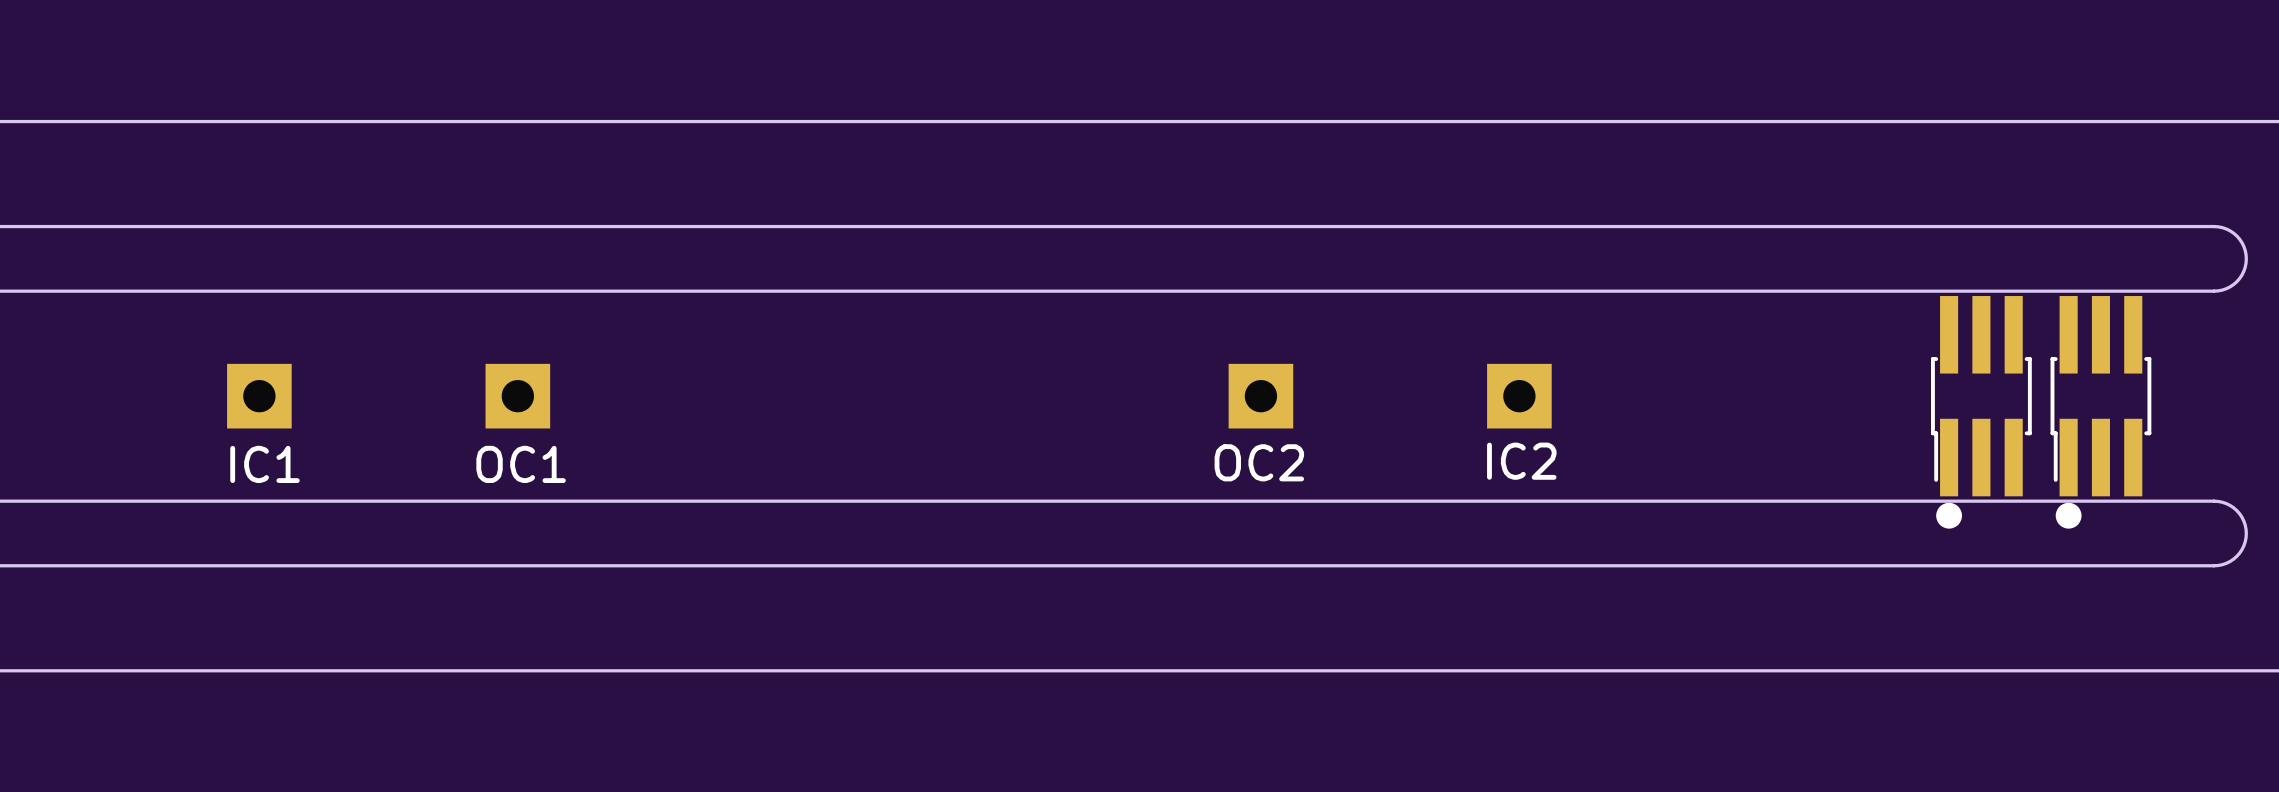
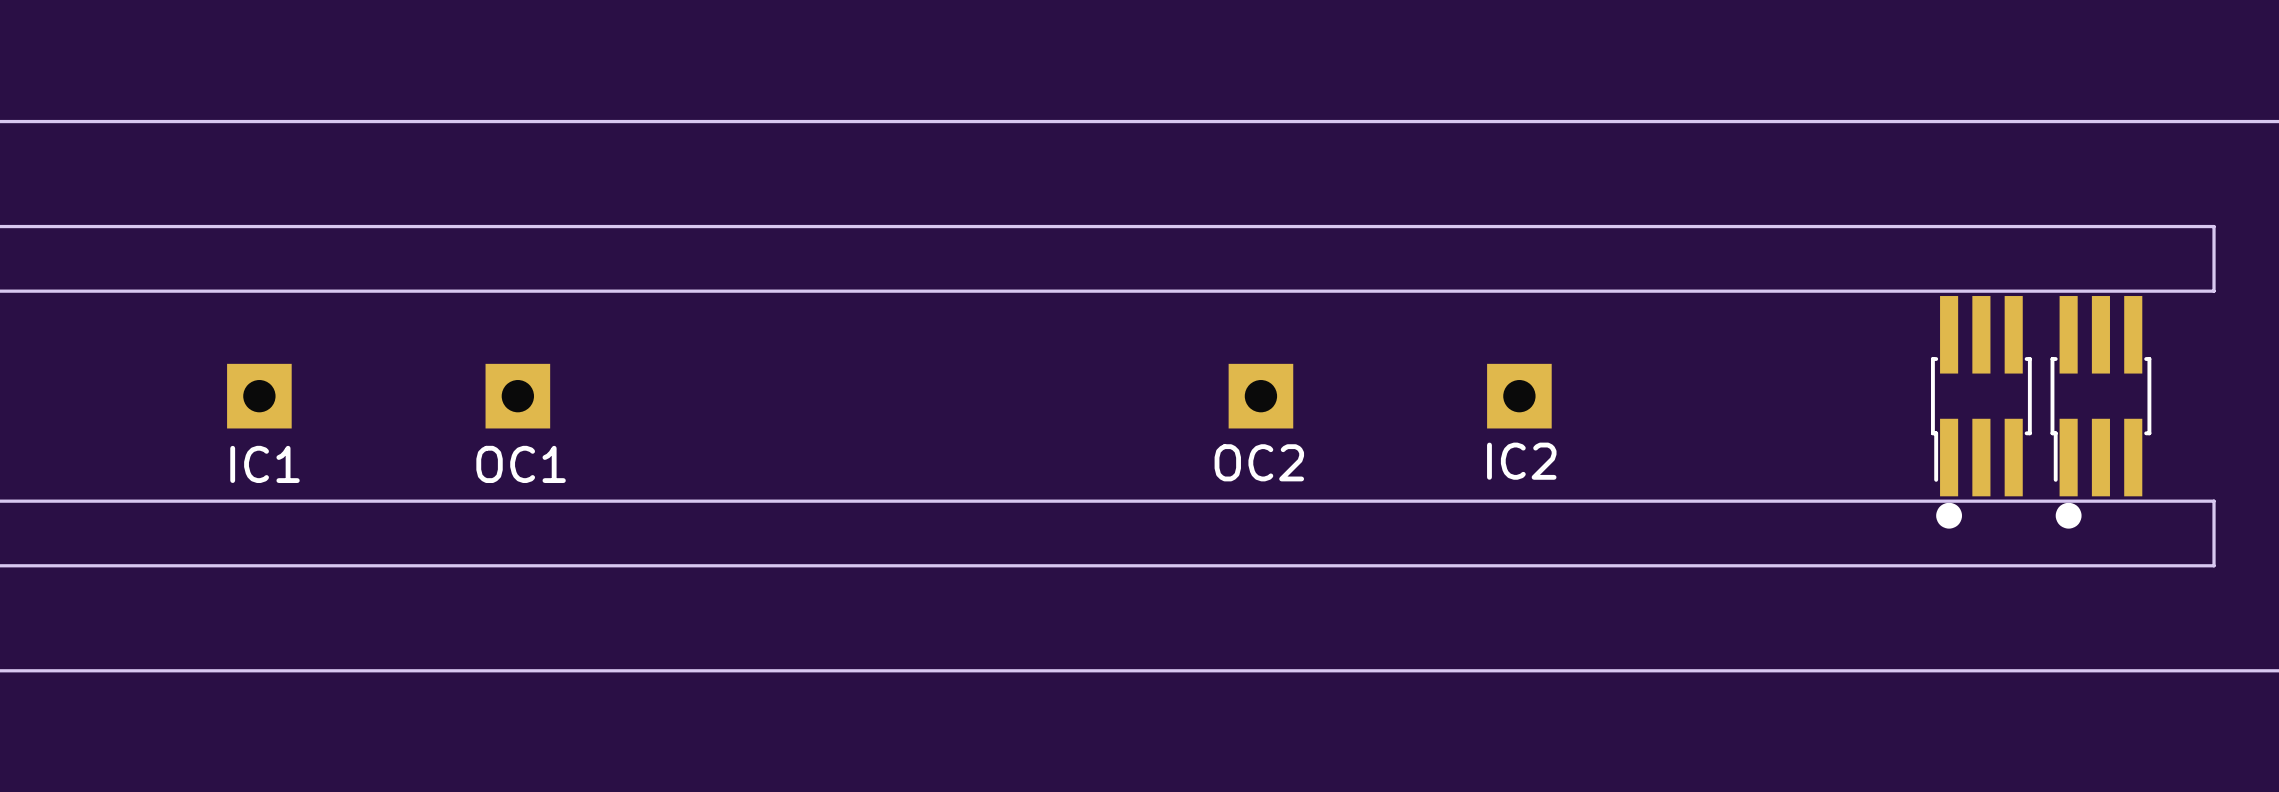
board edge: (2214, 226) (2226, 229) (2236, 236) (2243, 246) (2246, 258) (2243, 271) (2236, 281) (2226, 288) (2214, 291) -> (2214, 226) (2214, 291)
board edge: (2214, 501) (2226, 503) (2236, 510) (2243, 521) (2246, 533) (2243, 545) (2236, 556) (2226, 563) (2214, 565) -> (2214, 501) (2214, 565)

